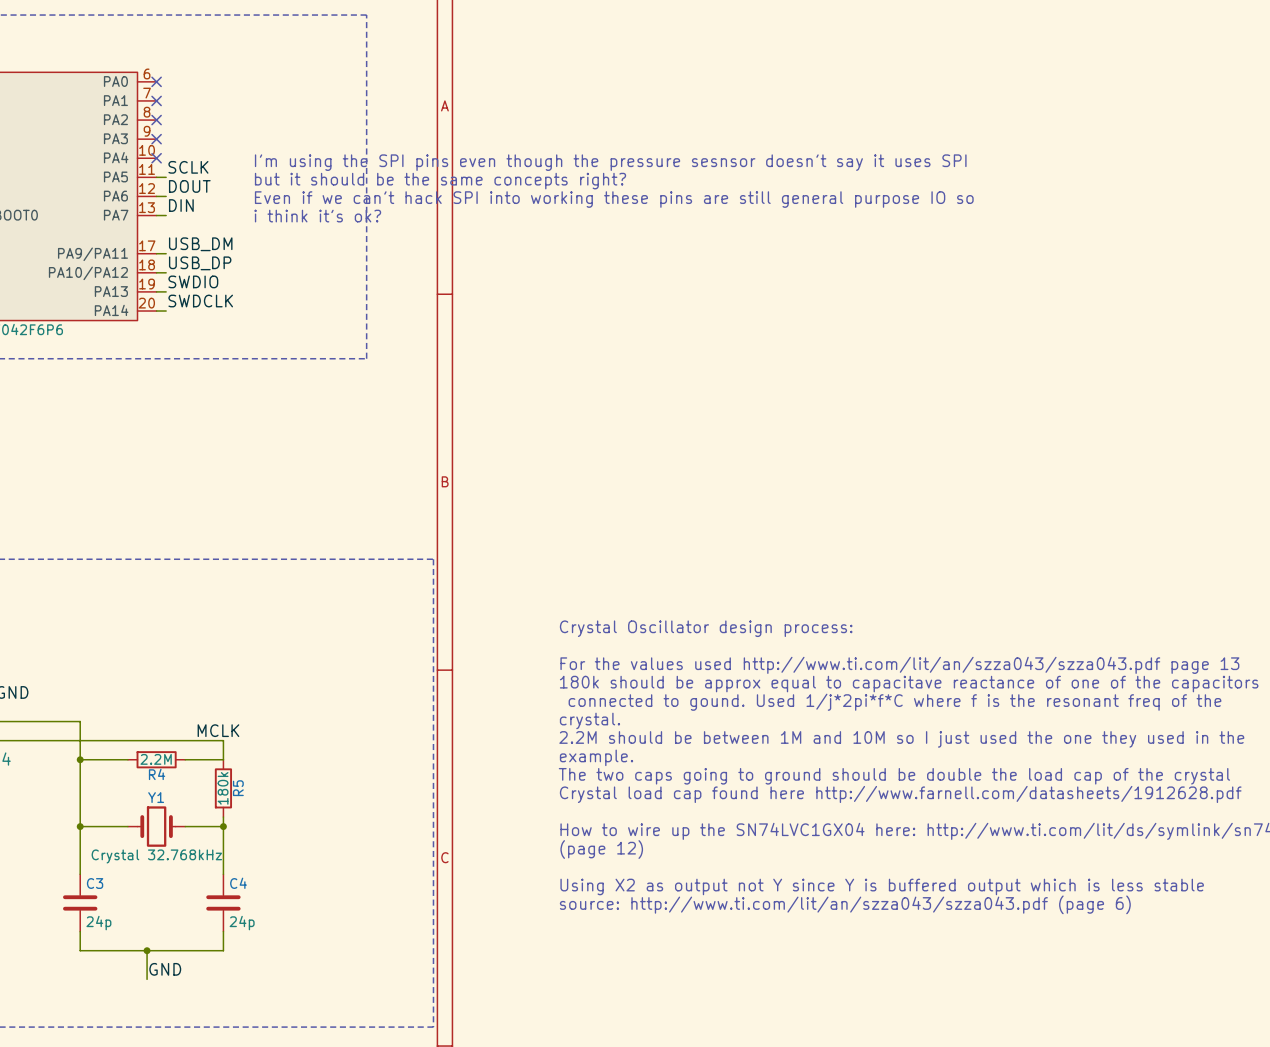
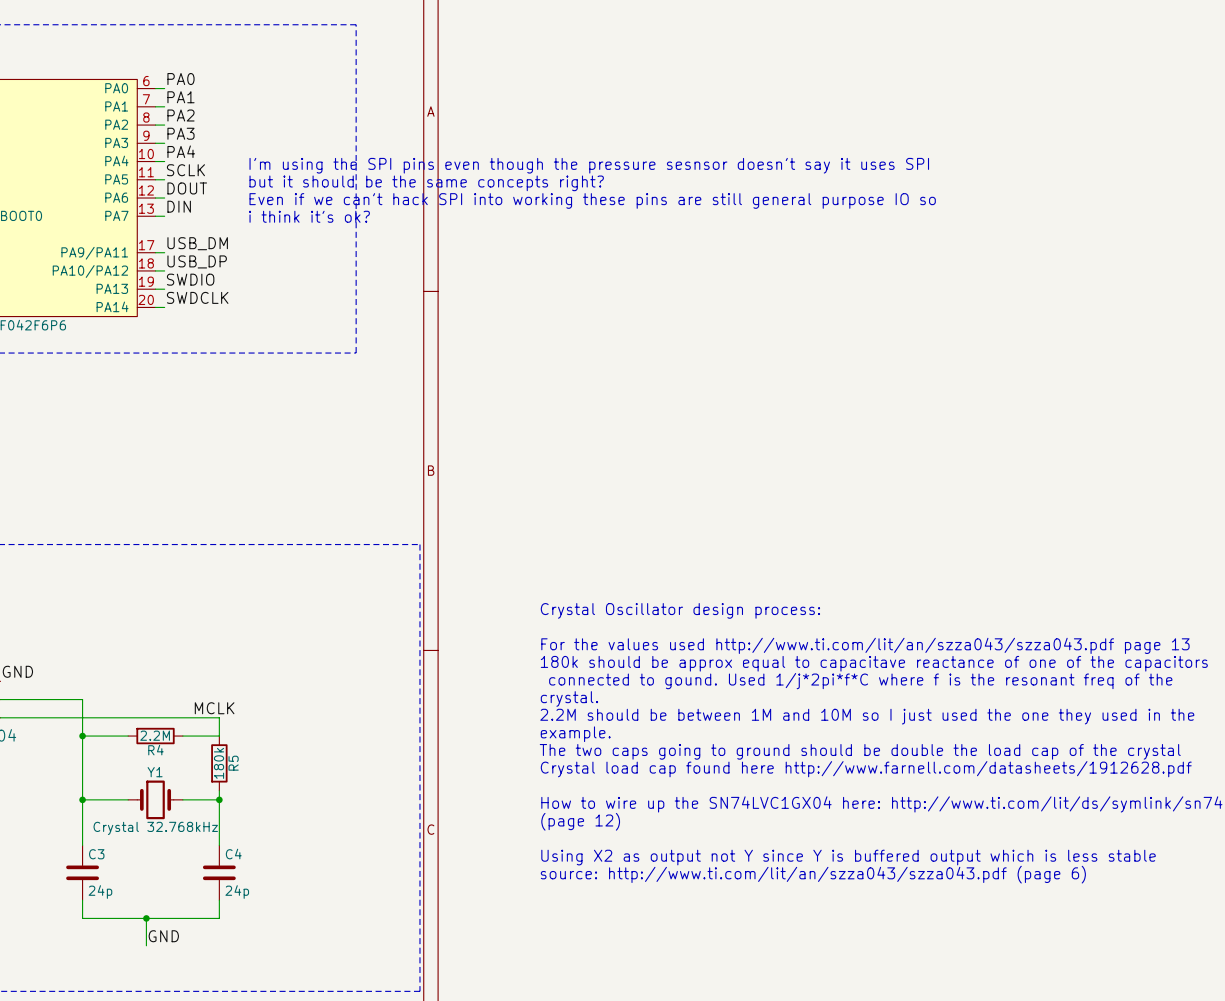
label: none -> PA0 (180, 79)
wire: none -> (155, 88) (164, 88)
no-connect mark: (156, 81) -> none
label: none -> PA1 (180, 97)
wire: none -> (155, 106) (164, 106)
no-connect mark: (156, 100) -> none
label: none -> PA2 (180, 115)
wire: none -> (155, 125) (164, 125)
no-connect mark: (156, 120) -> none
label: none -> PA3 (180, 133)
wire: none -> (155, 143) (164, 143)
no-connect mark: (156, 139) -> none
label: none -> PA4 (181, 151)
wire: none -> (155, 161) (164, 161)
no-connect mark: (156, 158) -> none

